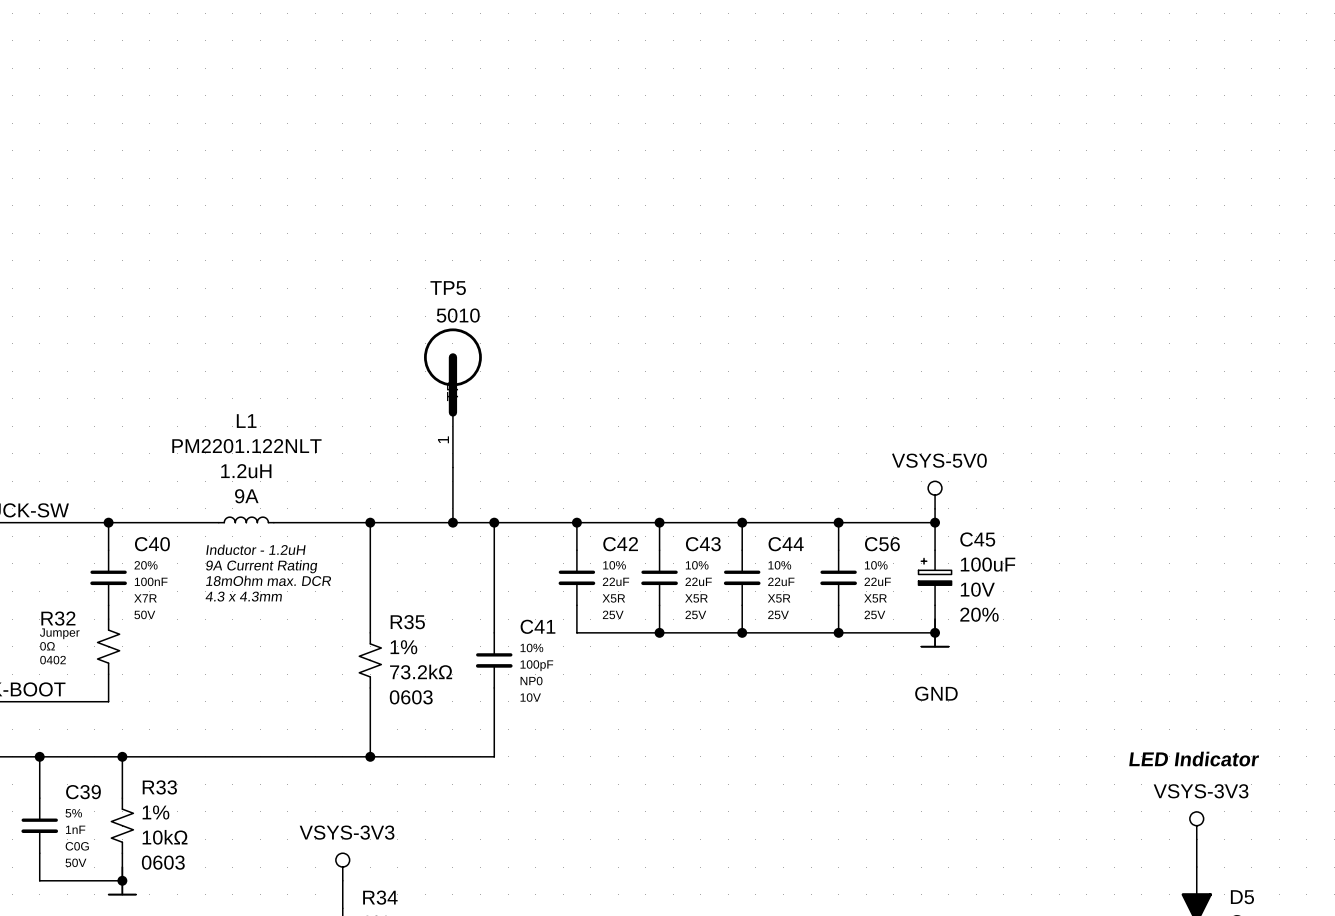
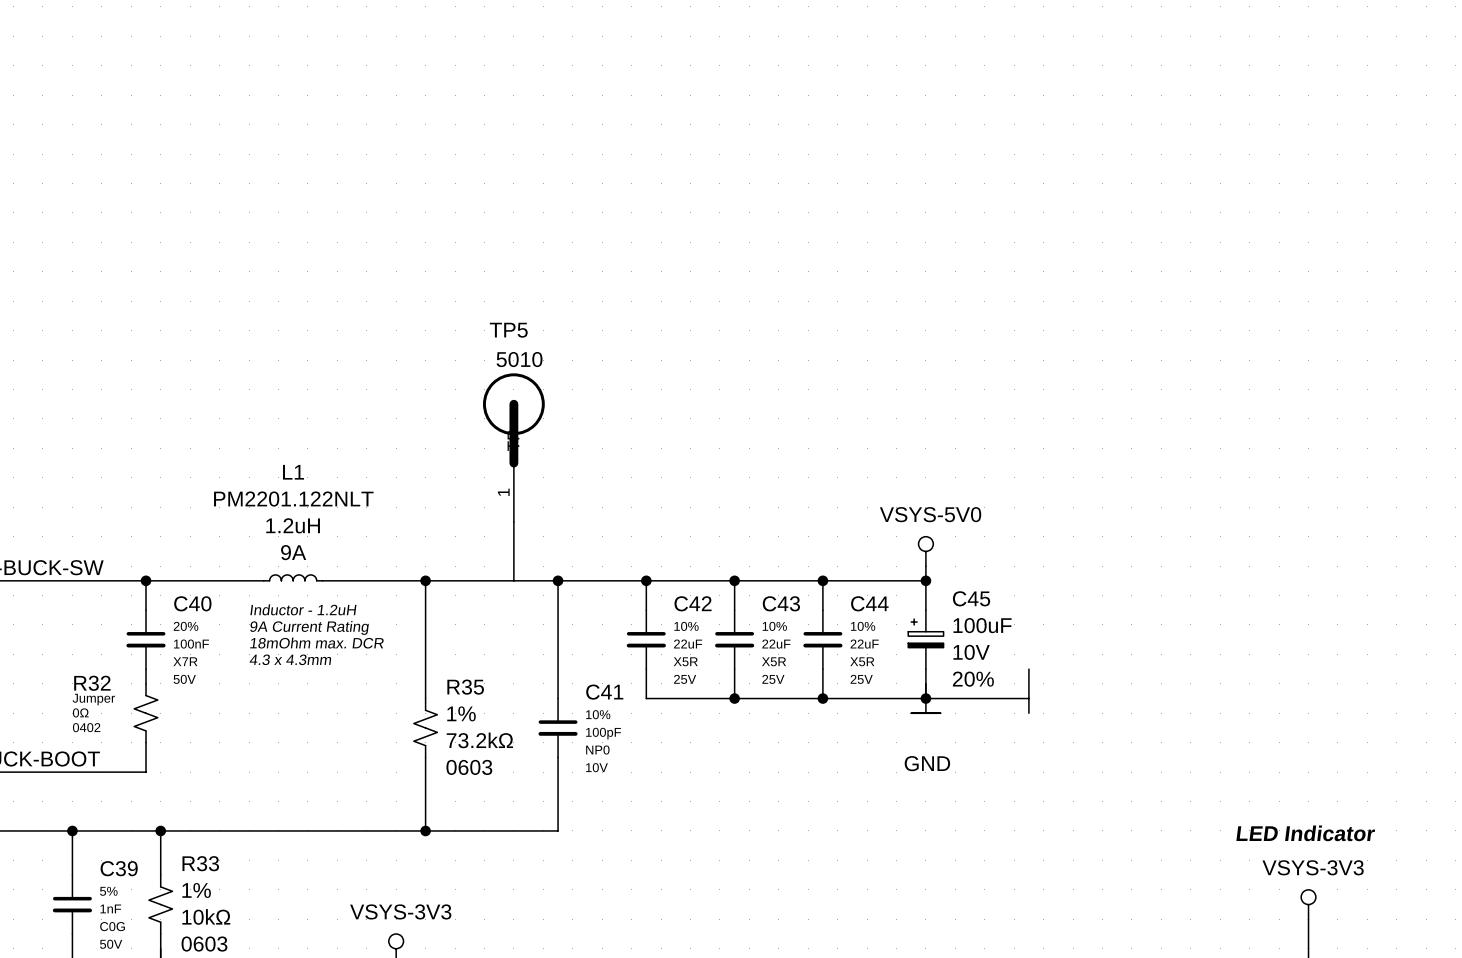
power symbol position: VSYS-5V0 (935, 495) -> VSYS-5V0 (925, 551)
wire: (935, 508) (935, 550) -> none
junction: (452, 522) -> none
wire: (838, 522) (935, 522) -> (925, 580) (925, 566)
junction: (935, 522) -> none
C56: (838, 577) -> none
C45 position: (935, 577) -> (925, 639)
power symbol position: GND (935, 632) -> GND (925, 698)
junction: (935, 632) -> none

